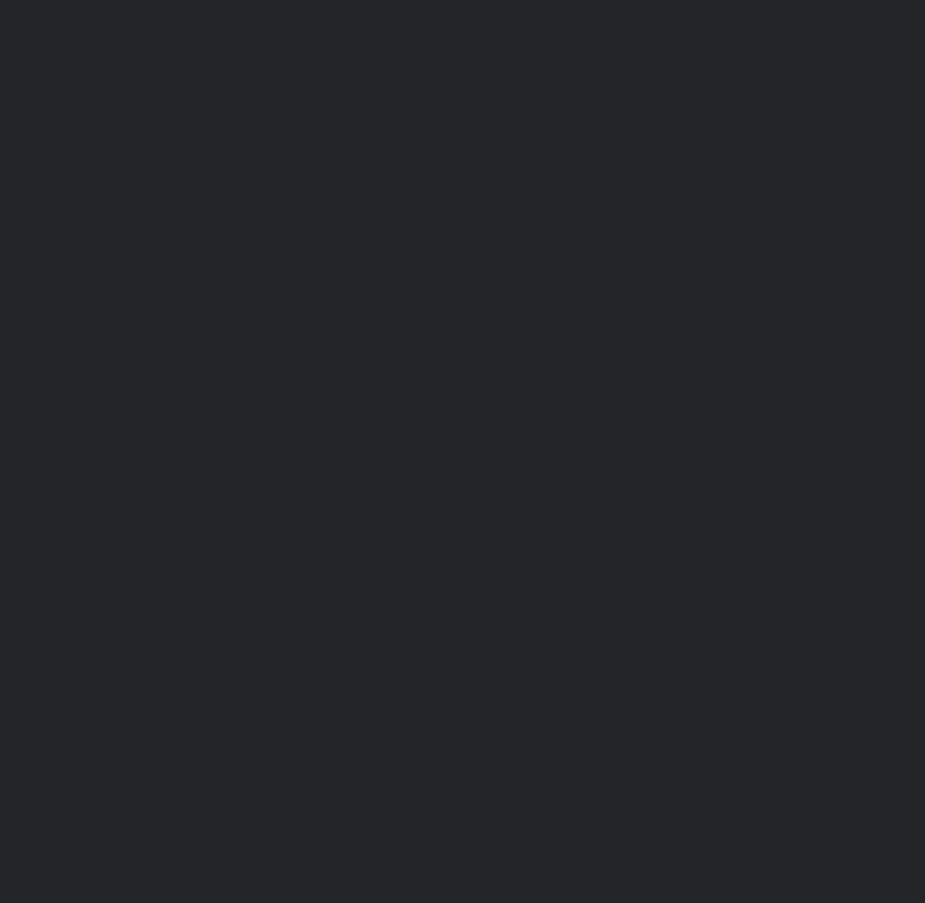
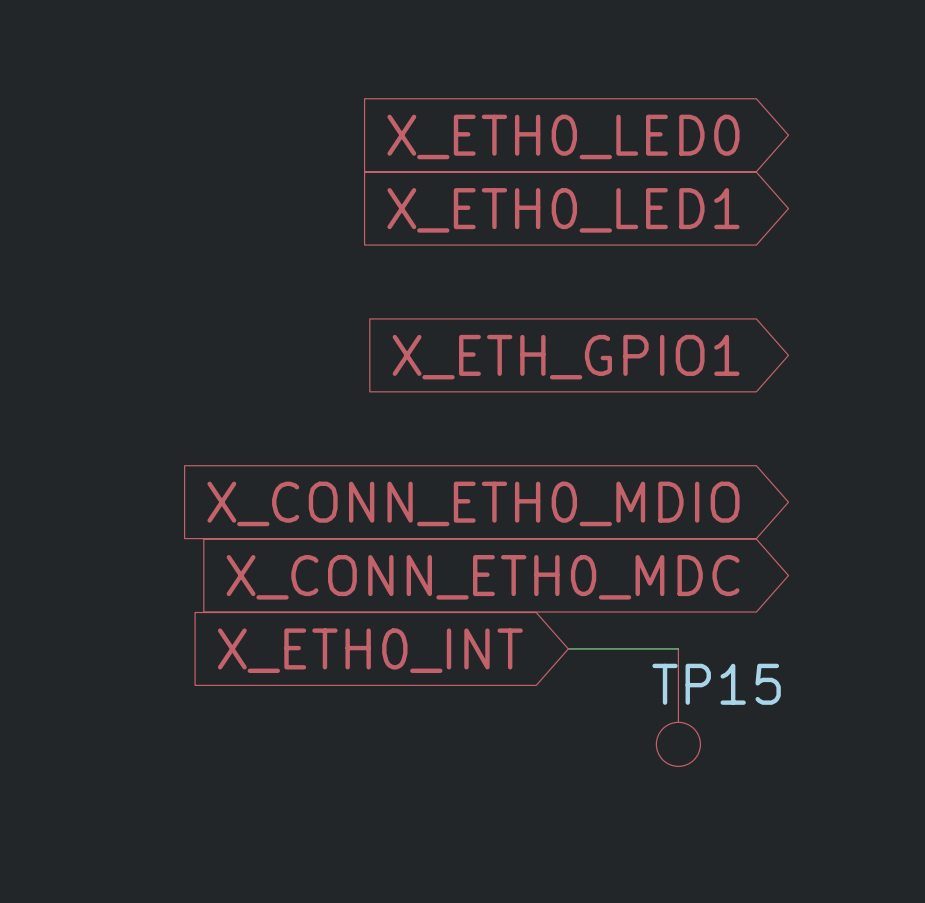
global label: none -> X_ETH0_LED0 (563, 136)
global label: none -> X_ETH0_LED1 (563, 210)
global label: none -> X_ETH_GPIO1 (566, 357)
global label: none -> X_CONN_ETH0_MDIO (473, 503)
global label: none -> X_CONN_ETH0_MDC (483, 577)
wire: none -> (568, 648) (678, 648)
global label: none -> X_ETH0_INT (370, 650)
TP15: none -> (678, 707)

